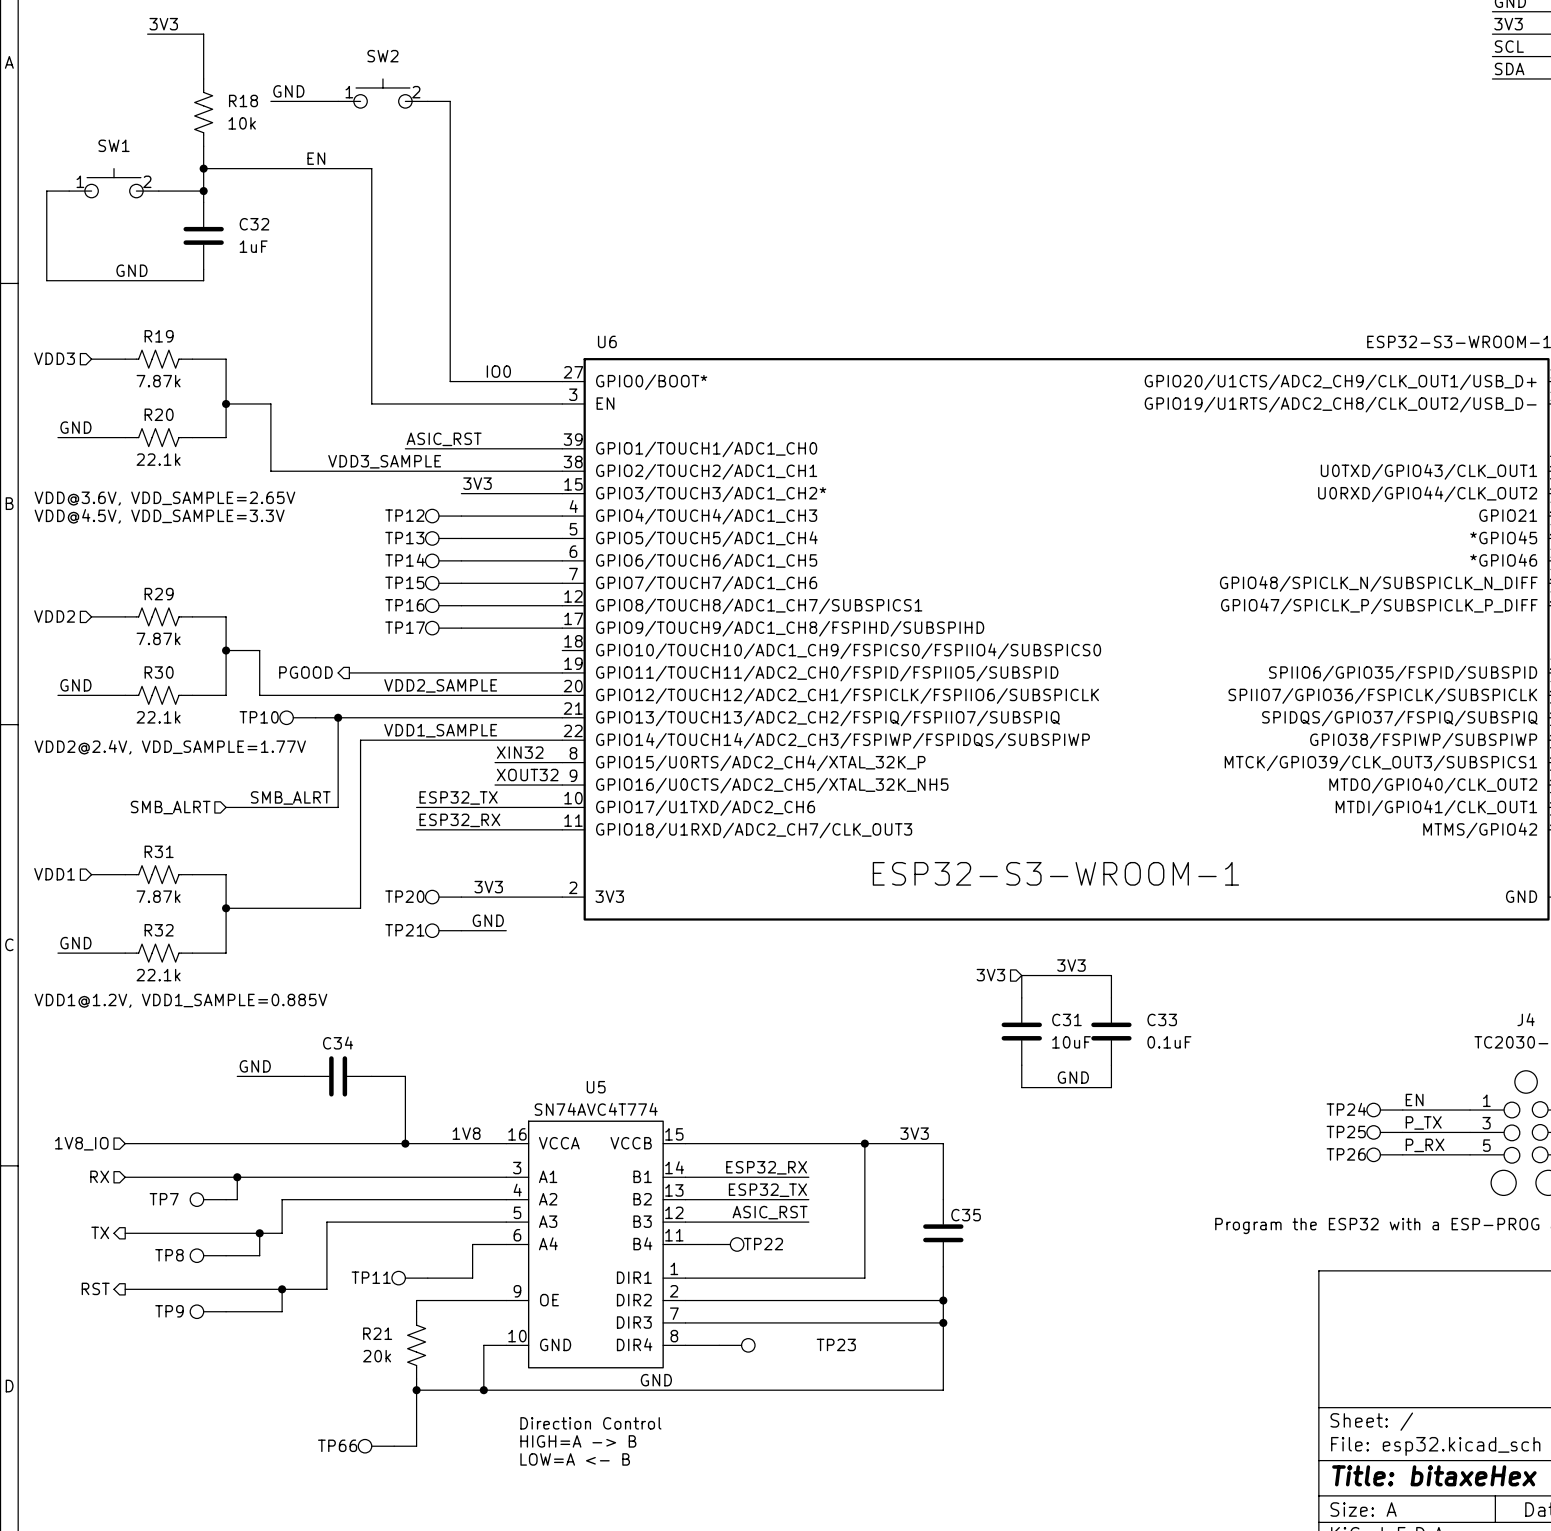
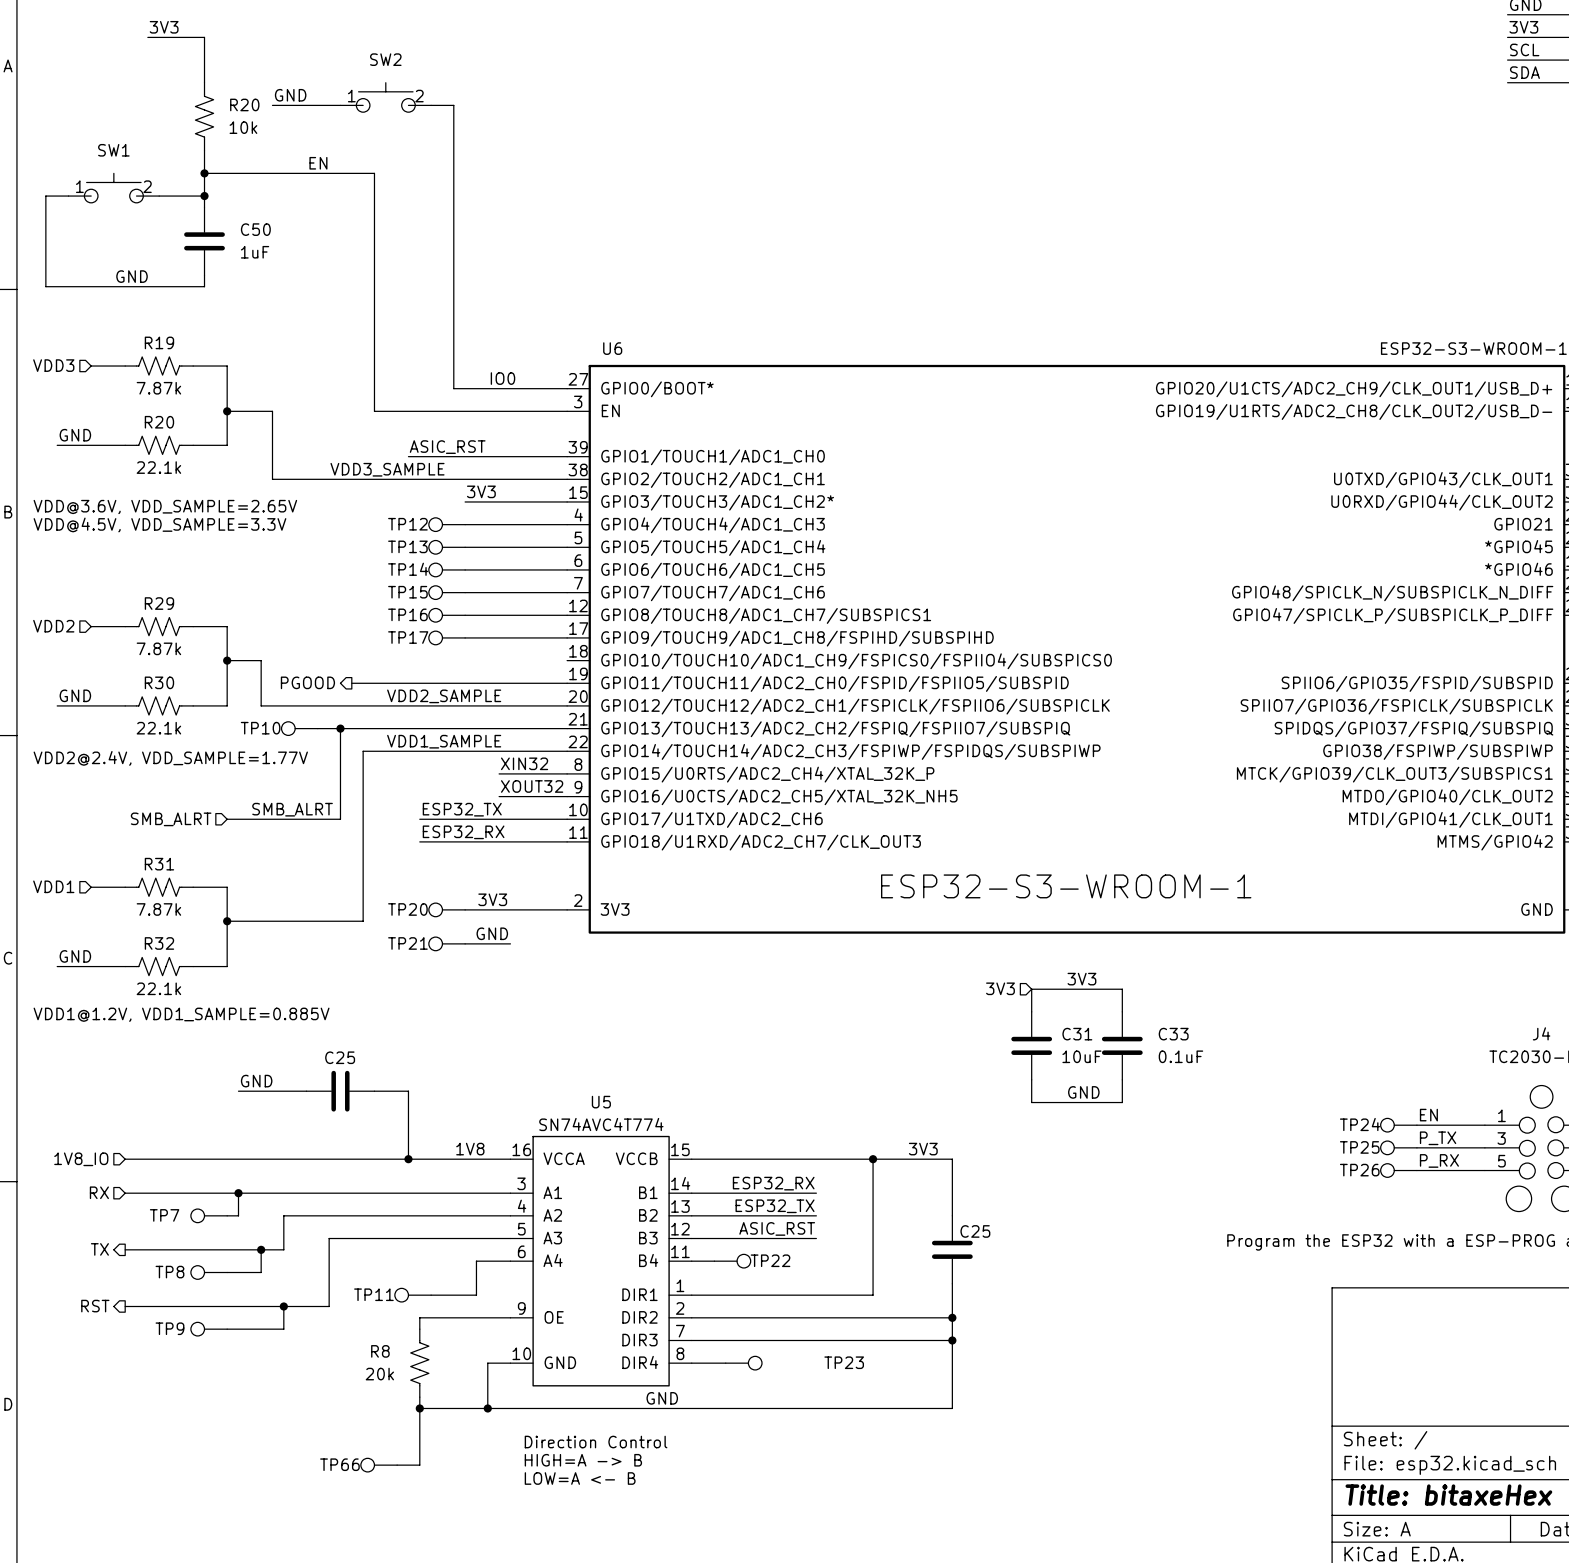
R18 name: R18 (243, 100) -> R20 (244, 104)
C32 name: C32 (254, 224) -> C50 (255, 229)
C34 name: C34 (338, 1043) -> C25 (340, 1057)
C35 name: C35 (966, 1215) -> C25 (975, 1231)
R21 name: R21 (377, 1333) -> R8 (380, 1351)

